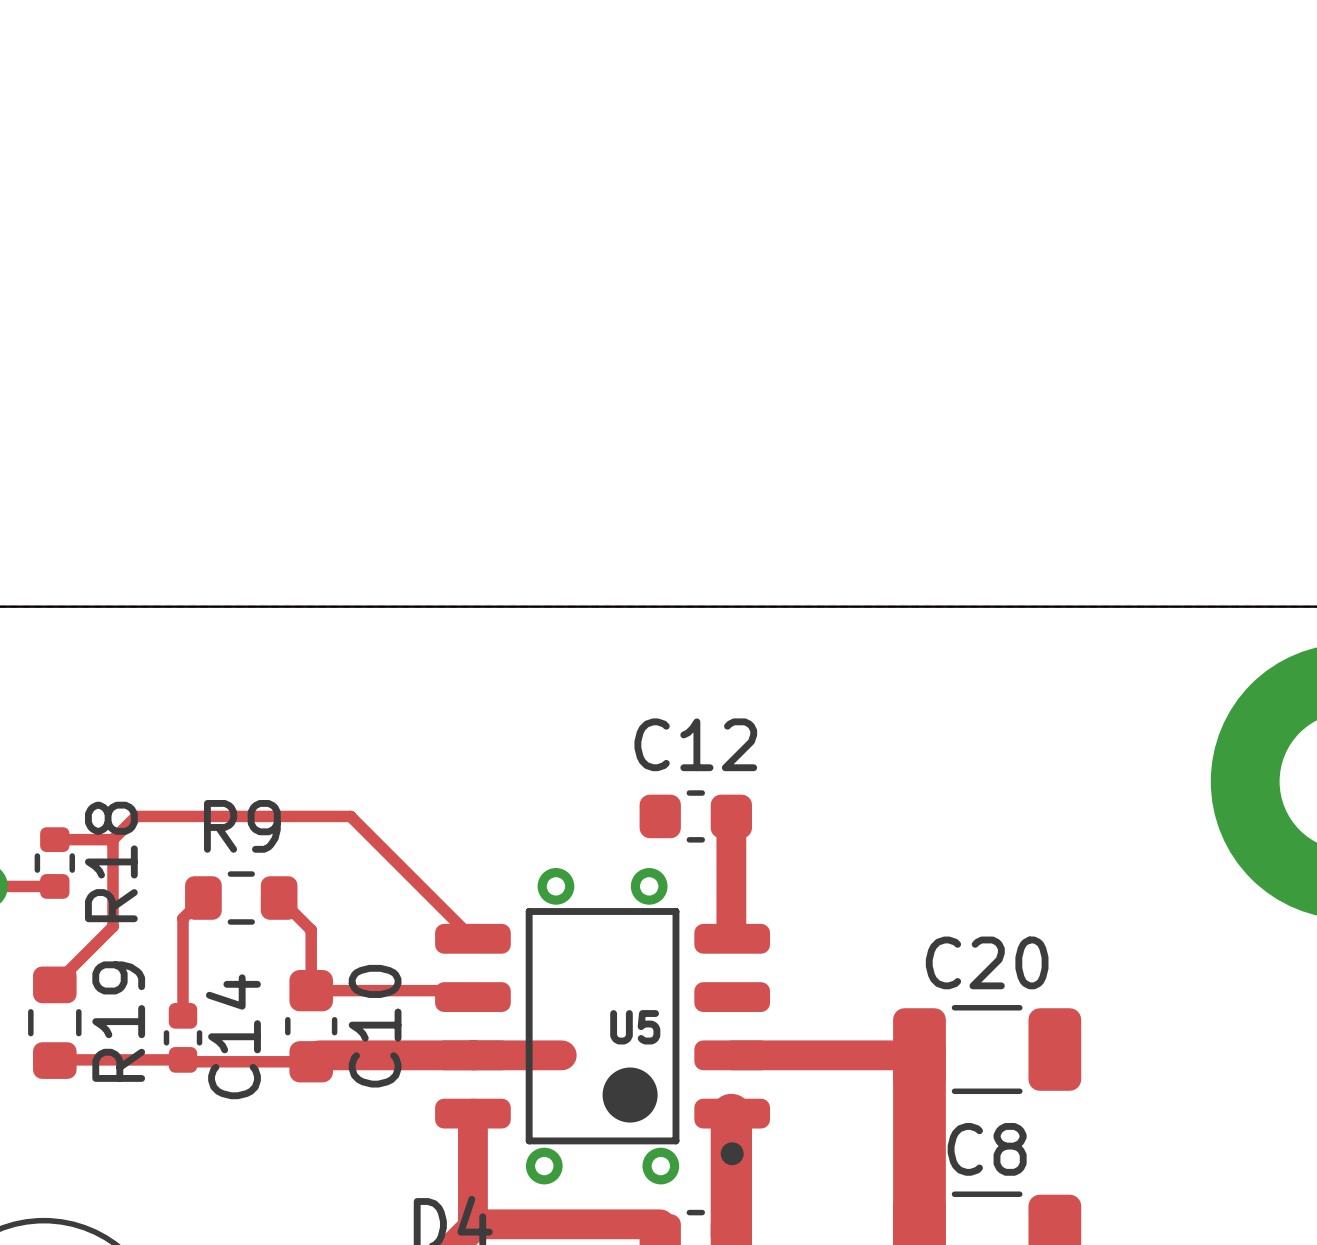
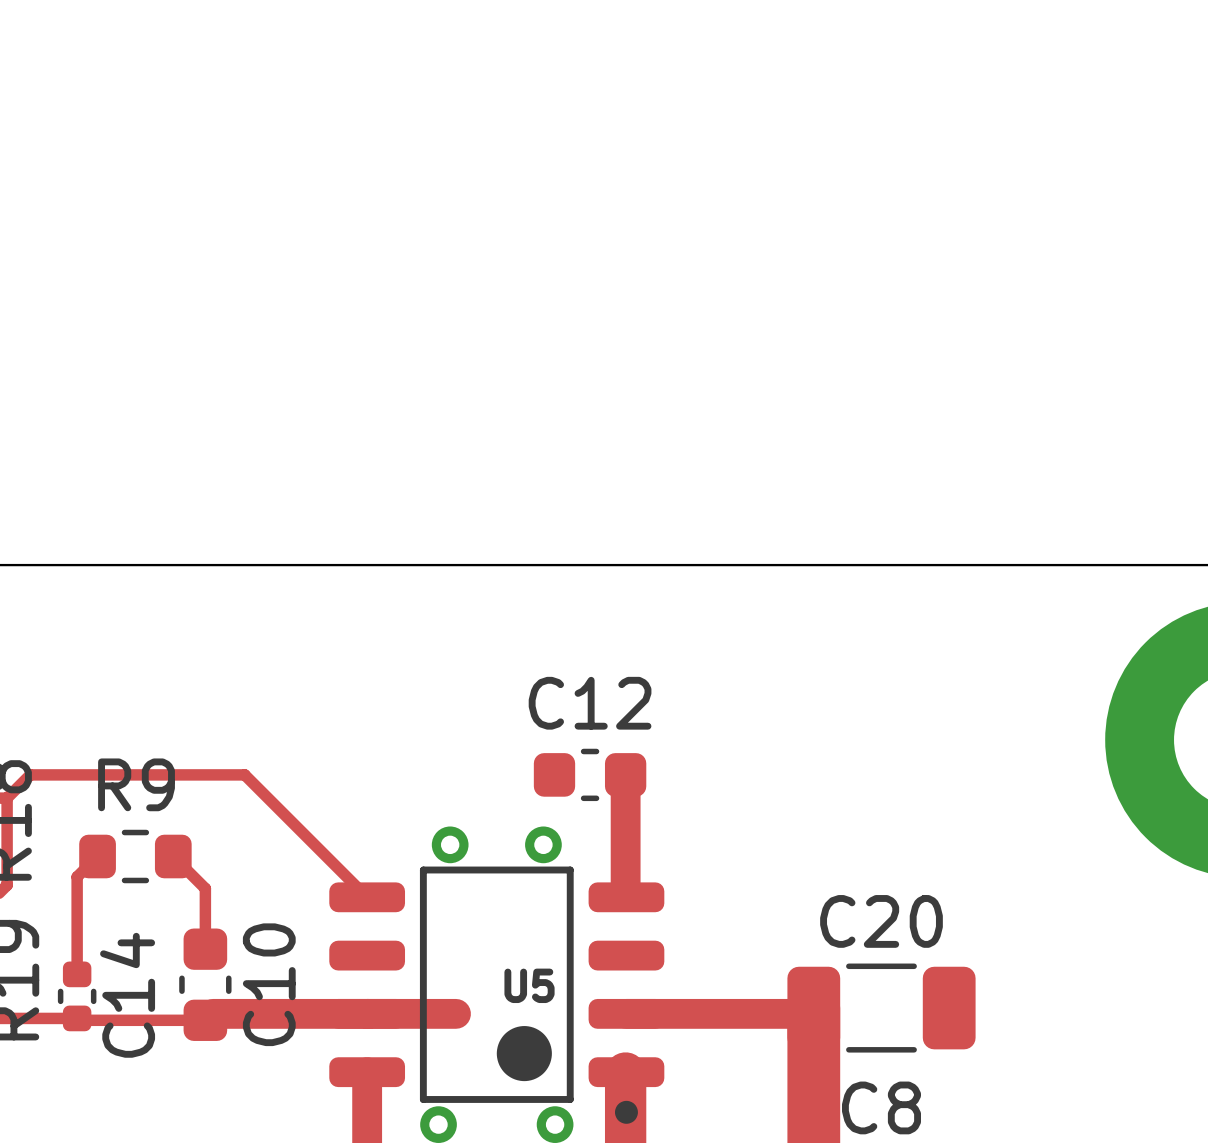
track: (311, 990) (466, 990) (472, 997) -> none

